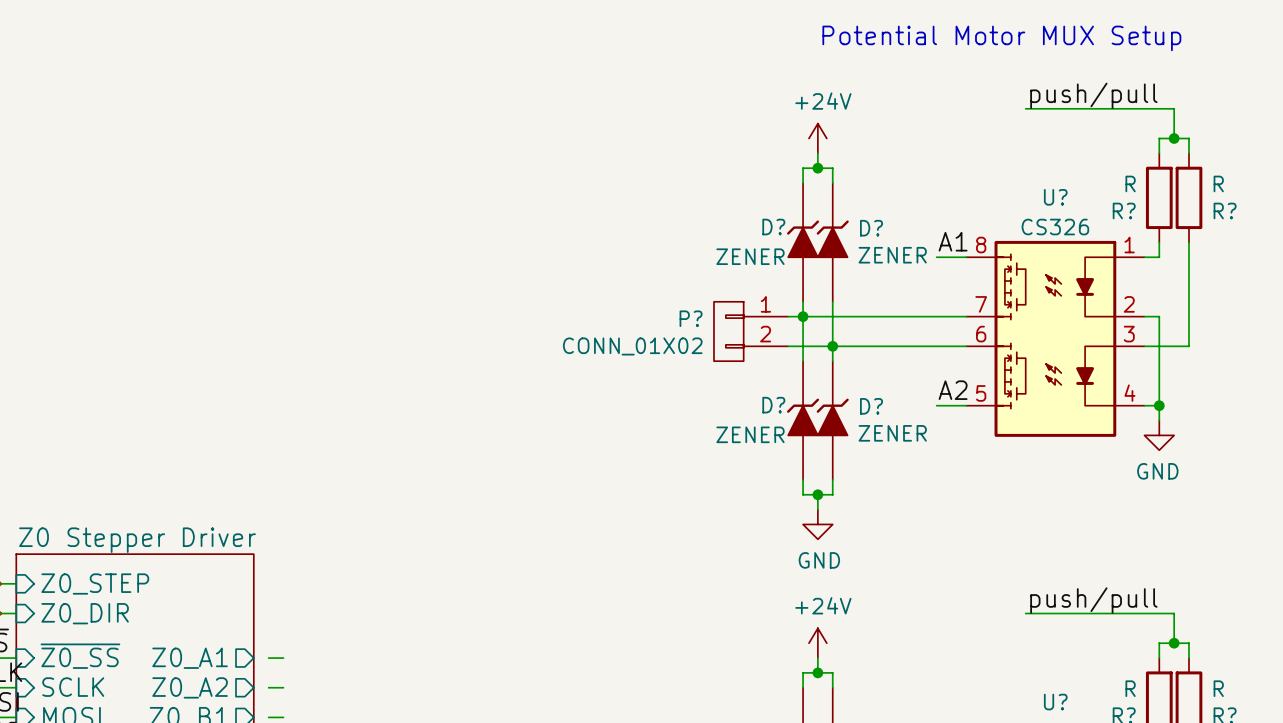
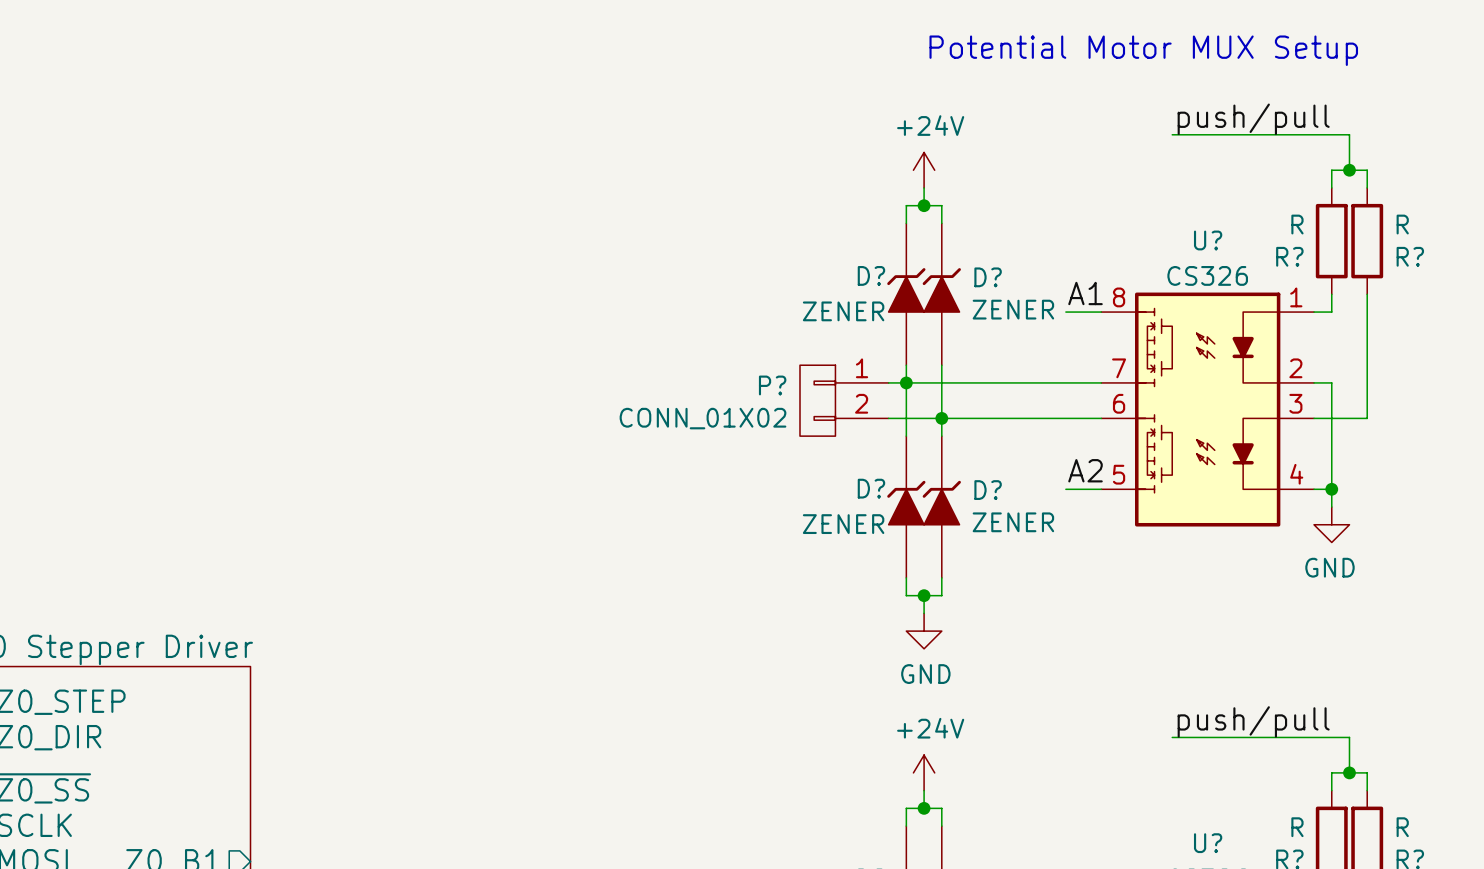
sheet pin: Z0_A1 (190, 658) -> none
wire: (268, 658) (283, 658) -> none
sheet pin: Z0_A2 (190, 687) -> none
wire: (268, 687) (283, 687) -> none
wire: (268, 717) (283, 717) -> none

